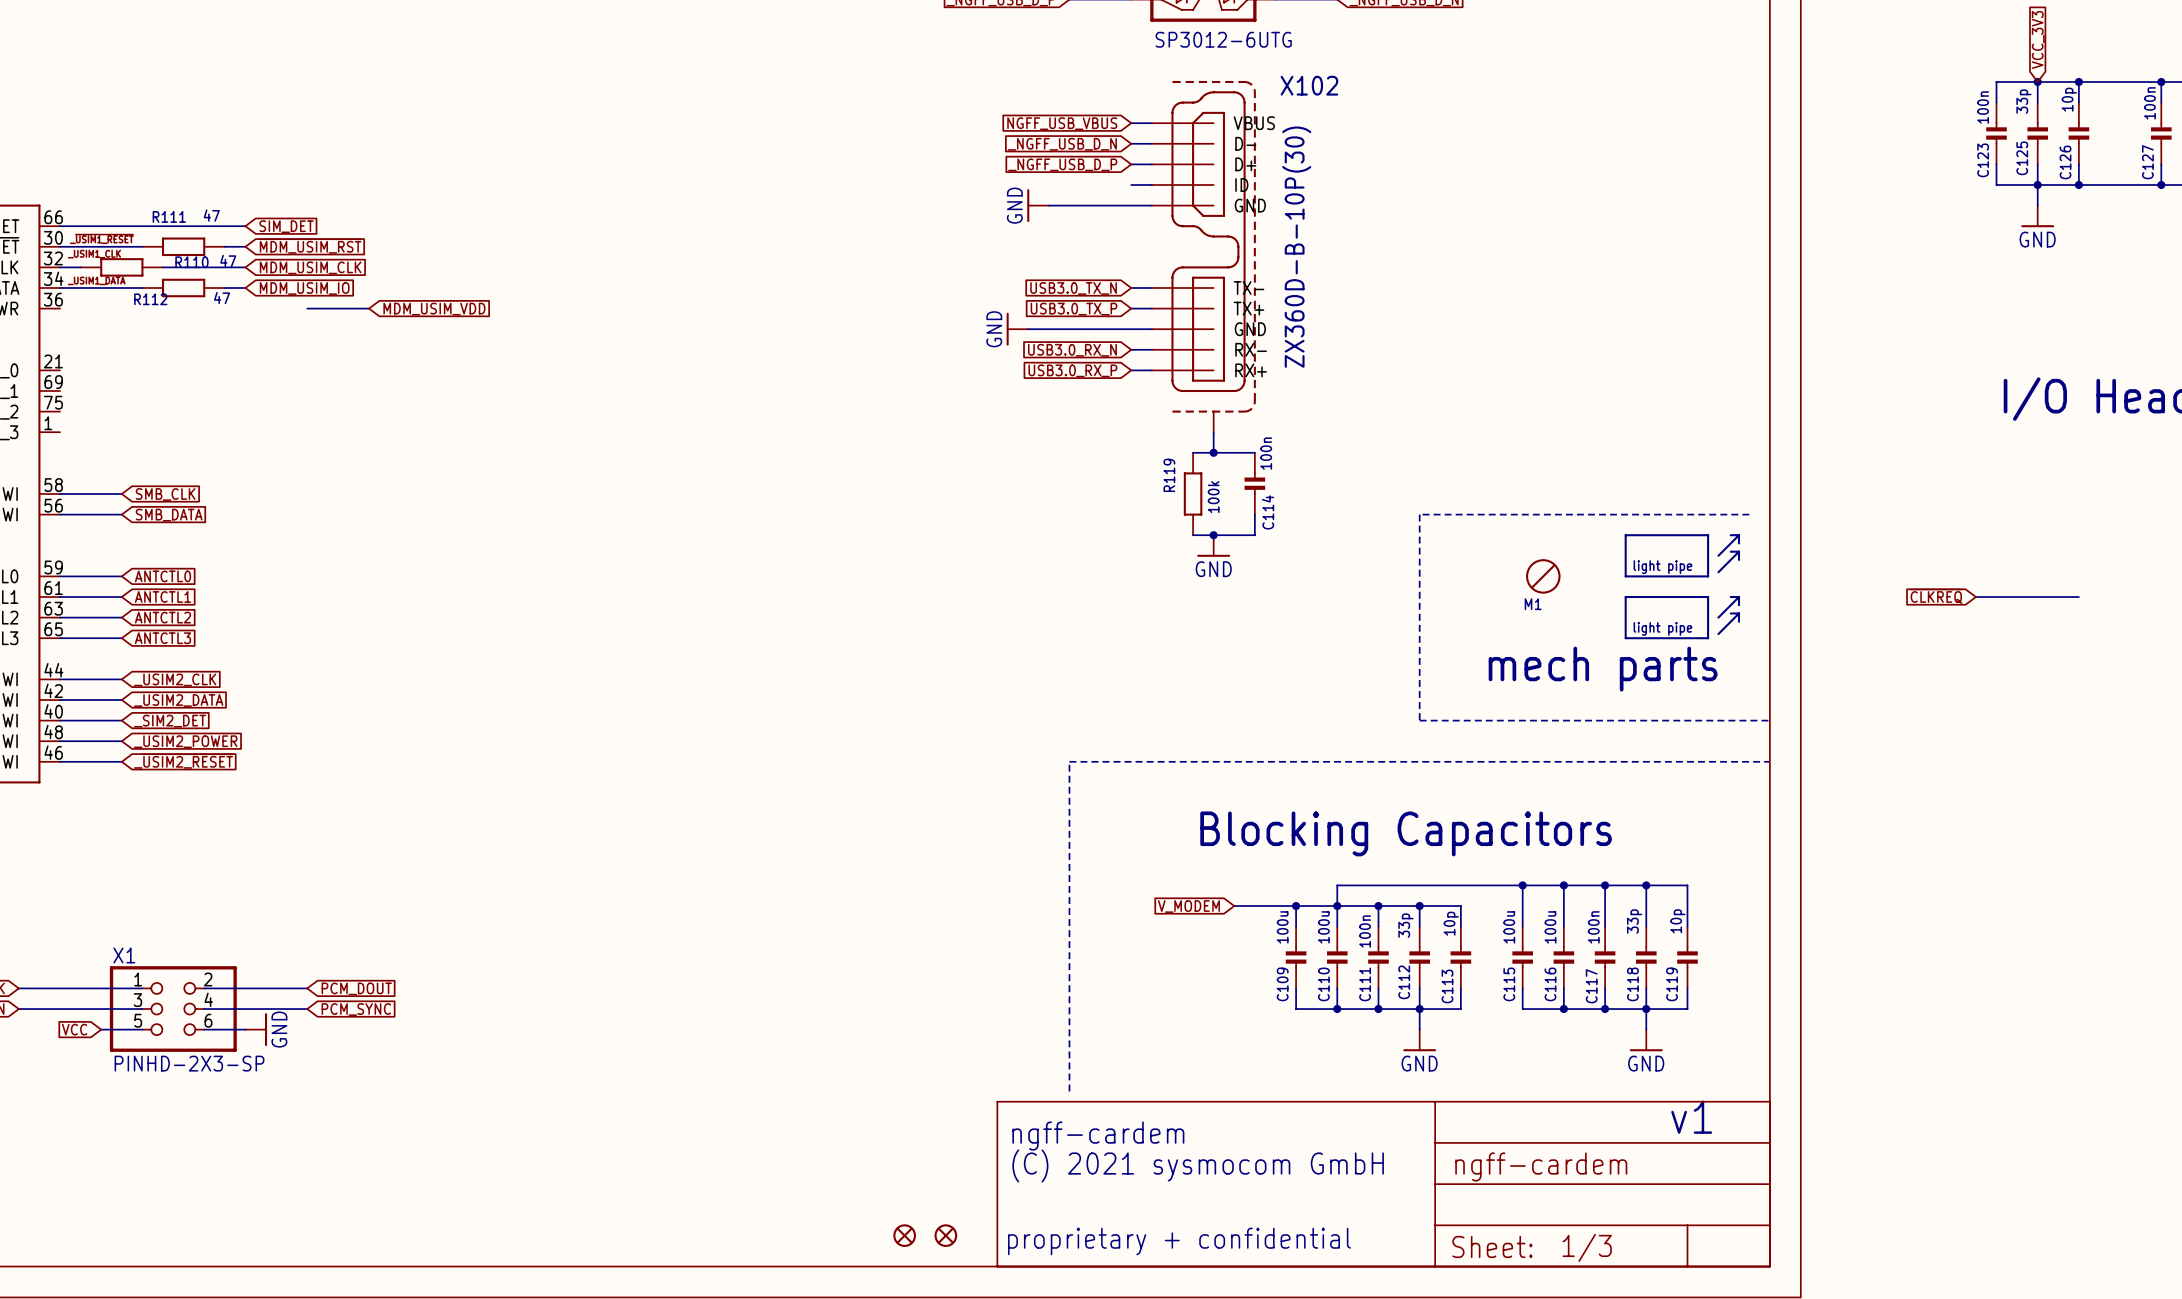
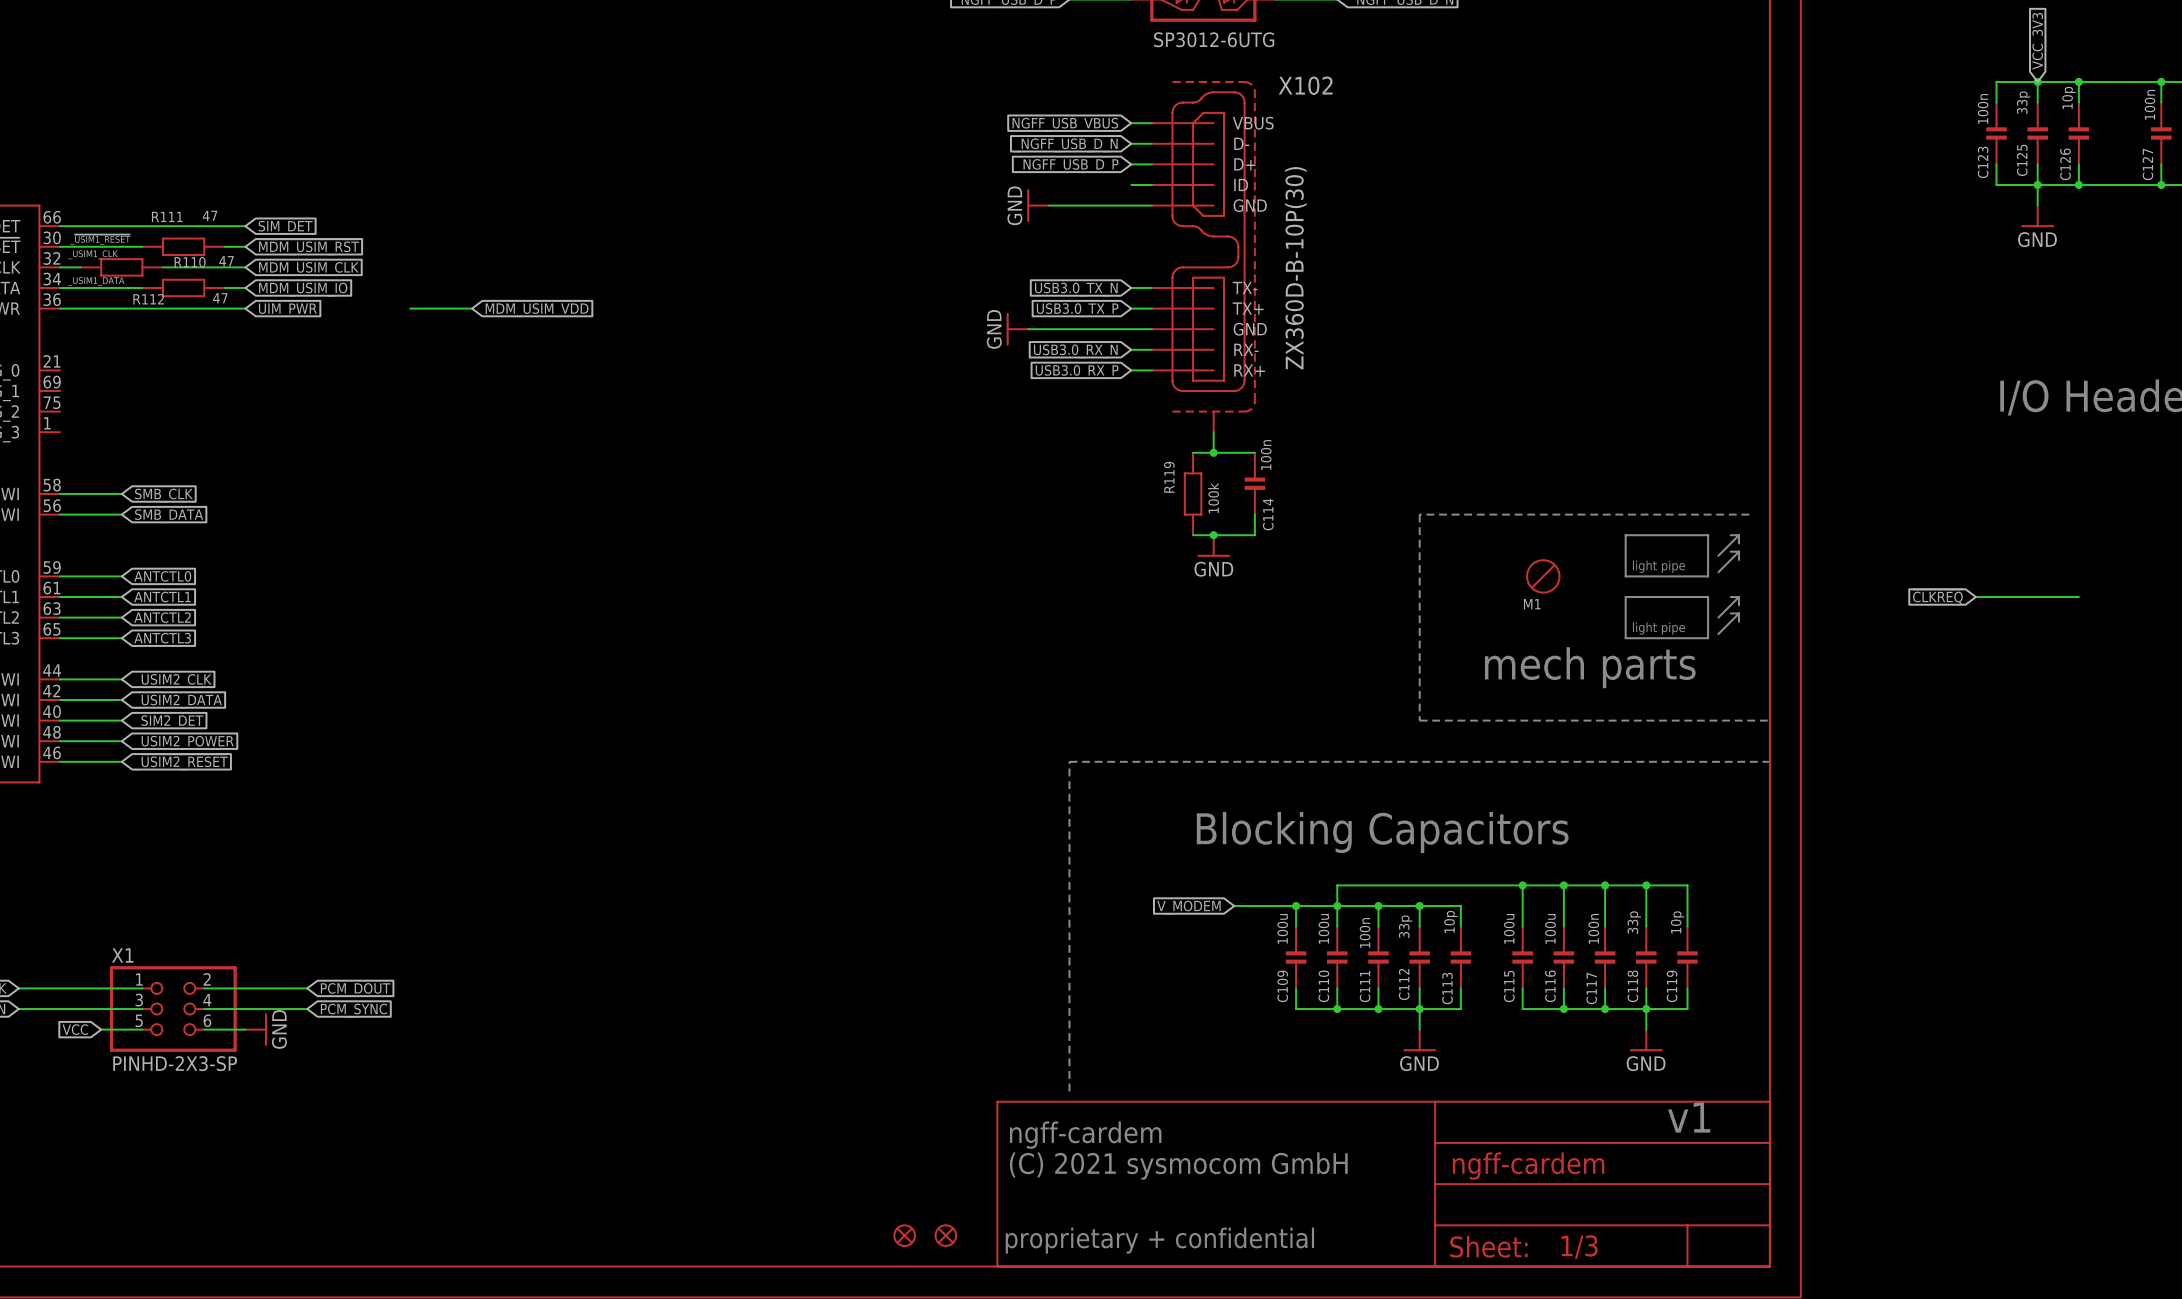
wire: none -> (60, 308) (245, 308)
wire: (307, 308) (369, 308) -> (410, 308) (472, 308)
global label: none -> UIM_PWR (287, 310)
global label position: MDM_USIM_VDD (434, 309) -> MDM_USIM_VDD (537, 310)

